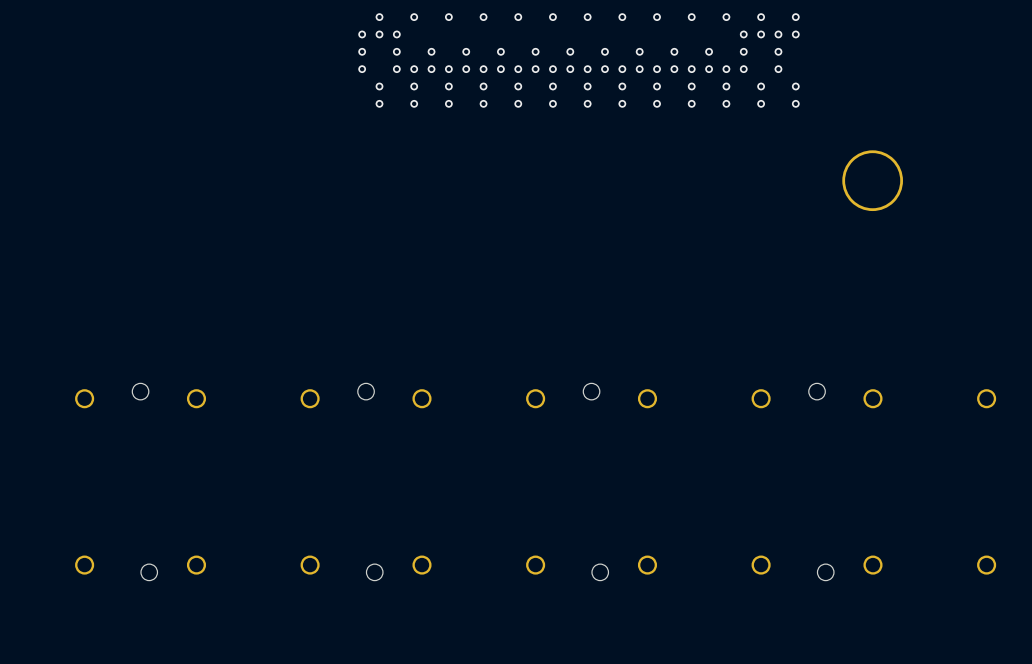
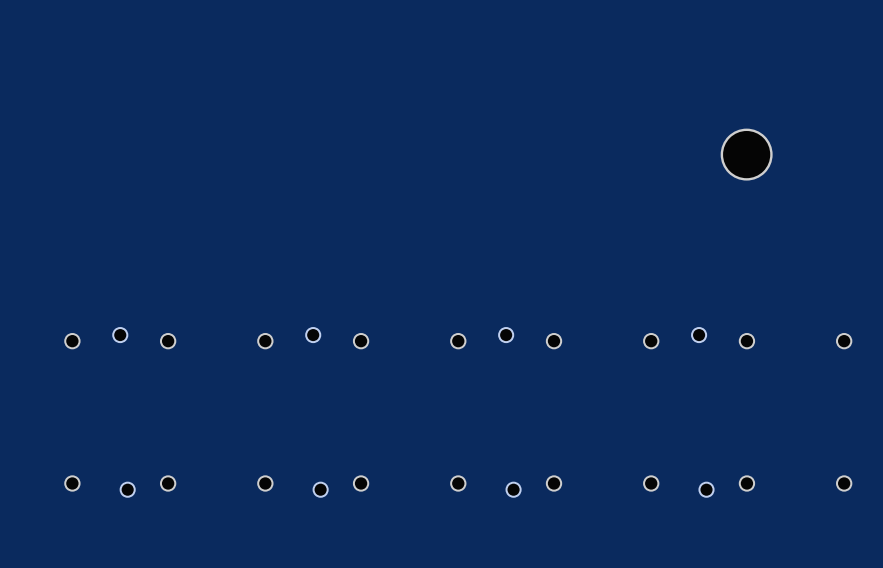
via: (379, 17) -> none
via: (414, 17) -> none
via: (448, 17) -> none
via: (483, 17) -> none
via: (518, 17) -> none
via: (552, 17) -> none
via: (587, 17) -> none
via: (622, 17) -> none
via: (657, 17) -> none
via: (691, 17) -> none
via: (726, 17) -> none
via: (761, 17) -> none
via: (795, 17) -> none
via: (362, 34) -> none
via: (379, 34) -> none
via: (396, 34) -> none
via: (743, 34) -> none
via: (761, 34) -> none
via: (778, 34) -> none
via: (795, 34) -> none
via: (362, 51) -> none
via: (396, 51) -> none
via: (431, 51) -> none
via: (466, 51) -> none
via: (500, 51) -> none
via: (535, 51) -> none
via: (570, 51) -> none
via: (604, 51) -> none
via: (639, 51) -> none
via: (674, 51) -> none
via: (709, 51) -> none
via: (743, 51) -> none
via: (778, 51) -> none
via: (362, 69) -> none
via: (396, 69) -> none
via: (414, 69) -> none
via: (431, 69) -> none
via: (448, 69) -> none
via: (466, 69) -> none
via: (483, 69) -> none
via: (500, 69) -> none
via: (518, 69) -> none
via: (535, 69) -> none
via: (552, 69) -> none
via: (570, 69) -> none
via: (587, 69) -> none
via: (604, 69) -> none
via: (622, 69) -> none
via: (639, 69) -> none
via: (657, 69) -> none
via: (674, 69) -> none
via: (691, 69) -> none
via: (709, 69) -> none
via: (726, 69) -> none
via: (743, 69) -> none
via: (778, 69) -> none
via: (379, 86) -> none
via: (414, 86) -> none
via: (448, 86) -> none
via: (483, 86) -> none
via: (518, 86) -> none
via: (552, 86) -> none
via: (587, 86) -> none
via: (622, 86) -> none
via: (657, 86) -> none
via: (691, 86) -> none
via: (726, 86) -> none
via: (761, 86) -> none
via: (795, 86) -> none
via: (379, 103) -> none
via: (414, 103) -> none
via: (448, 103) -> none
via: (483, 103) -> none
via: (518, 103) -> none
via: (552, 103) -> none
via: (587, 103) -> none
via: (622, 103) -> none
via: (657, 103) -> none
via: (691, 103) -> none
via: (726, 103) -> none
via: (761, 103) -> none
via: (795, 103) -> none

